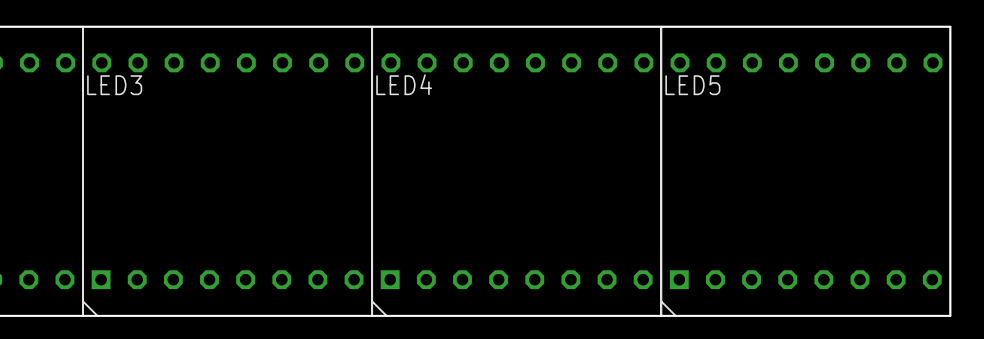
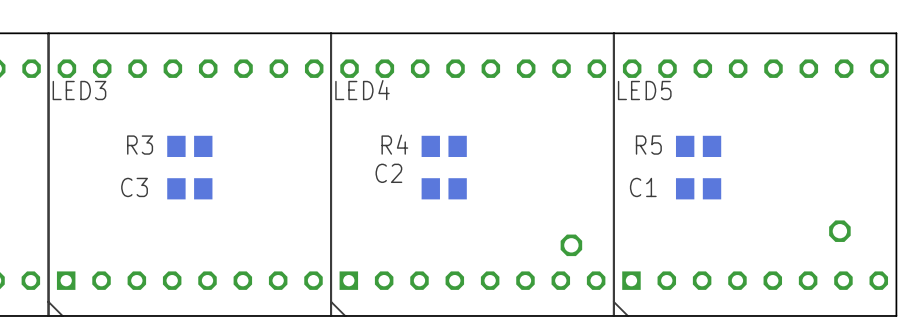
R3: none -> (189, 146)
R4: none -> (444, 146)
R5: none -> (698, 146)
C3: none -> (189, 188)
C2: none -> (444, 188)
C1: none -> (698, 188)
part: none -> (839, 231)
part: none -> (571, 245)

